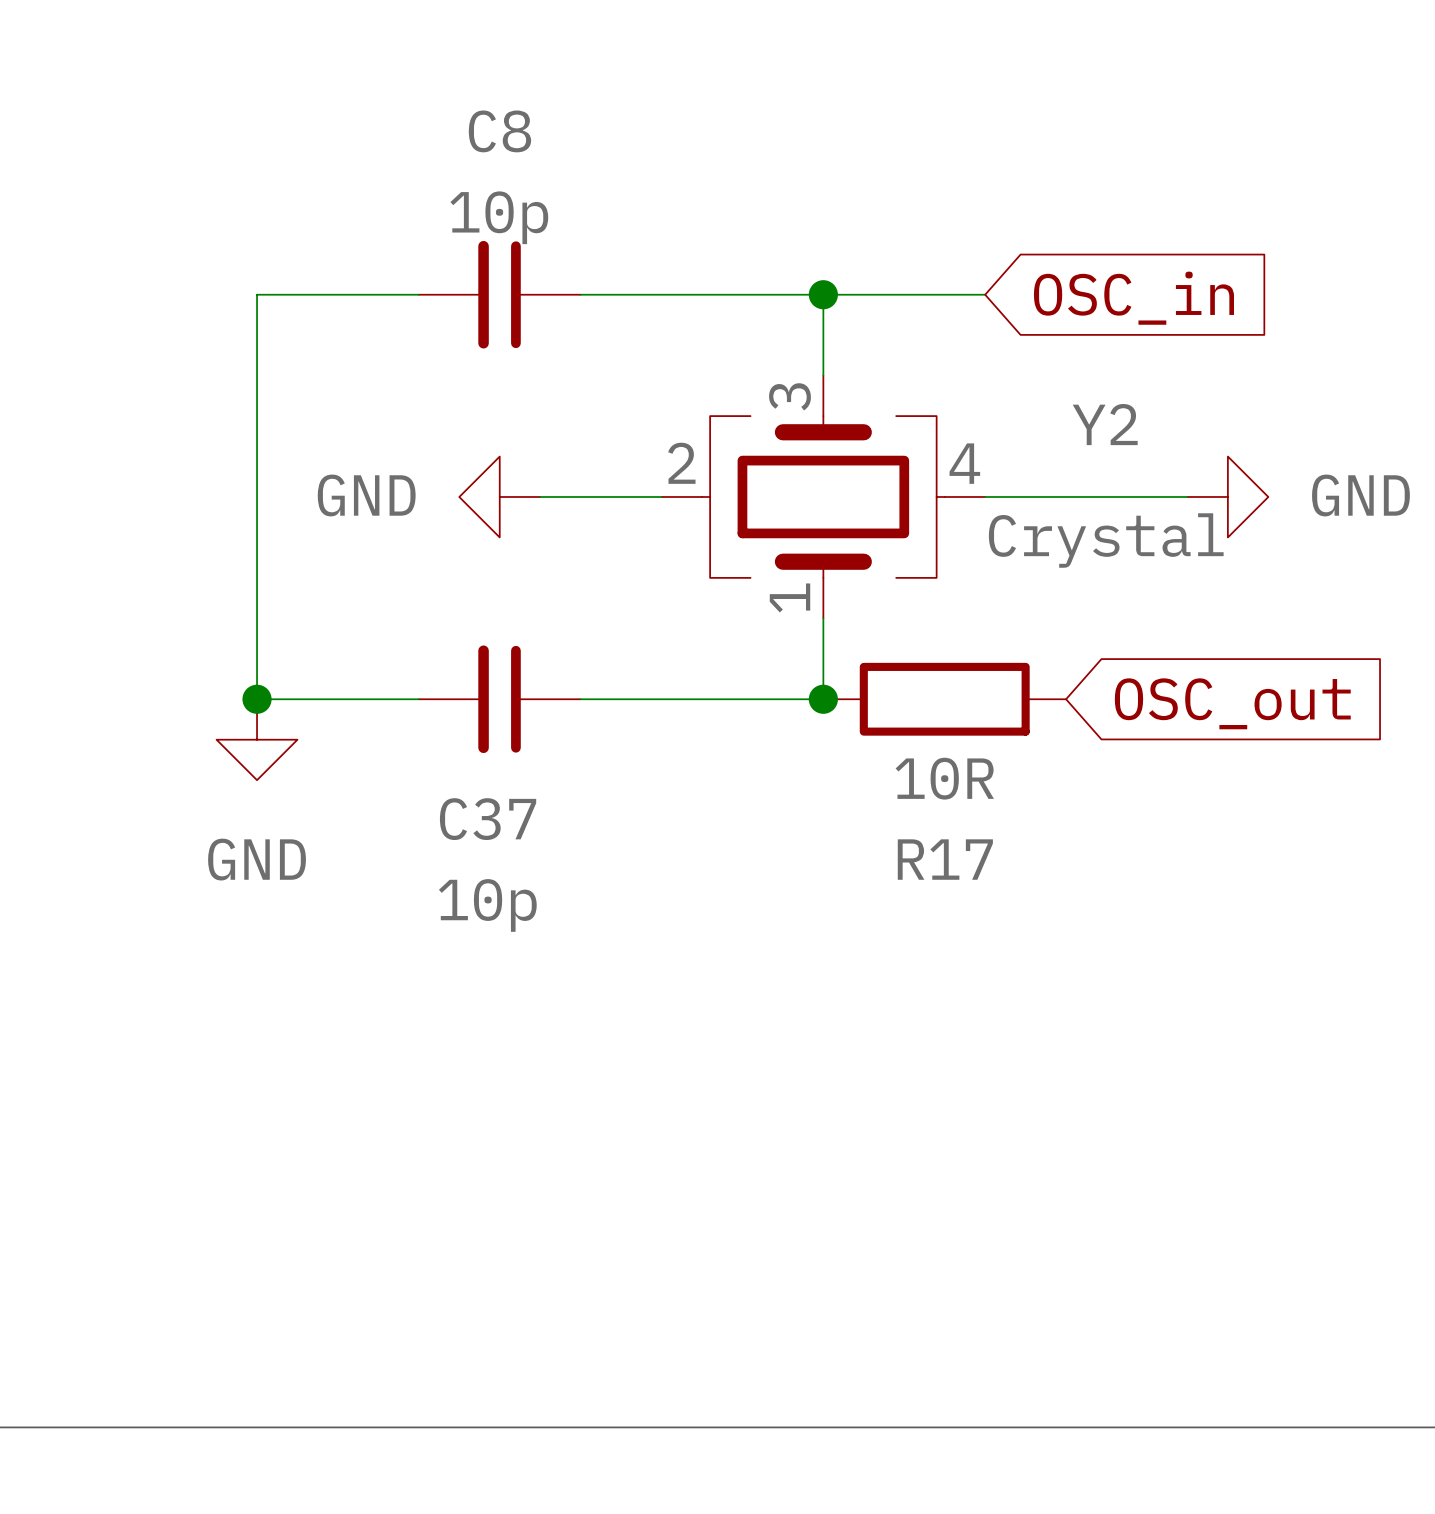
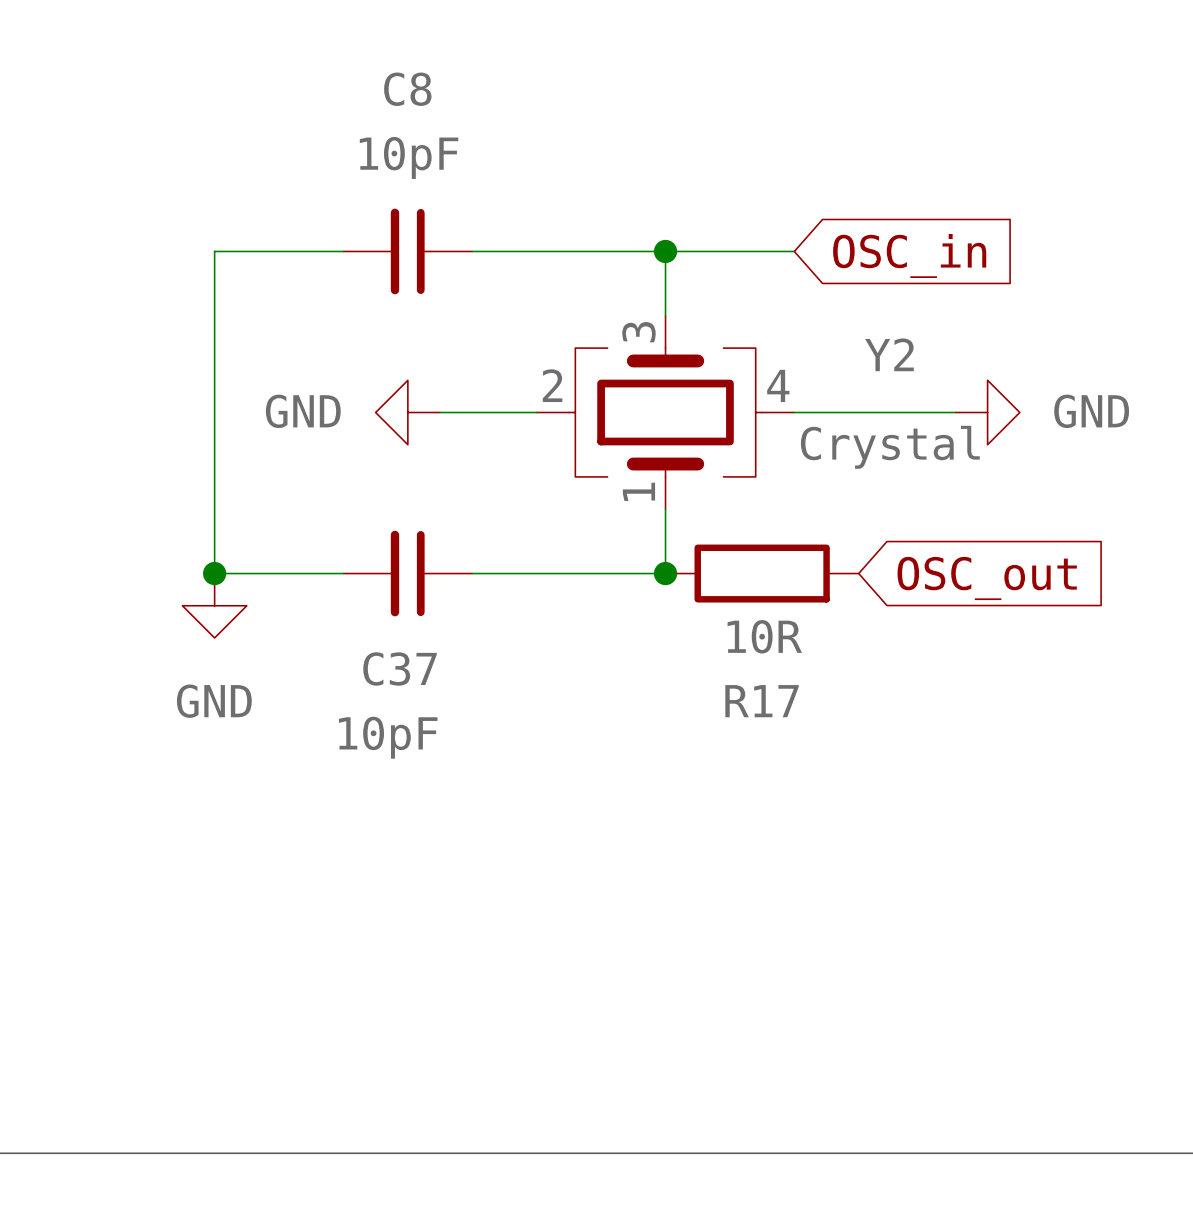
C8 name position: C8 (499, 131) -> C8 (407, 89)
C8 value: 10p (499, 217) -> 10pF (409, 157)
C37 value: 10p (487, 905) -> 10pF (388, 737)

